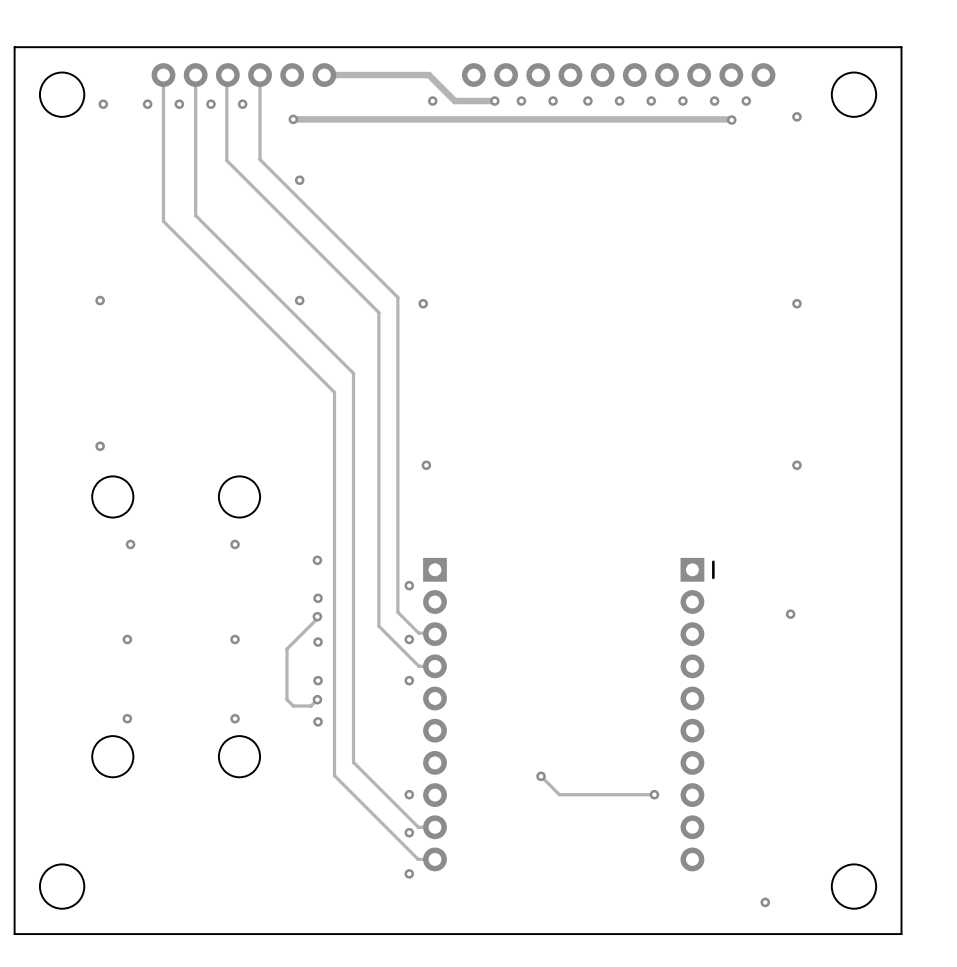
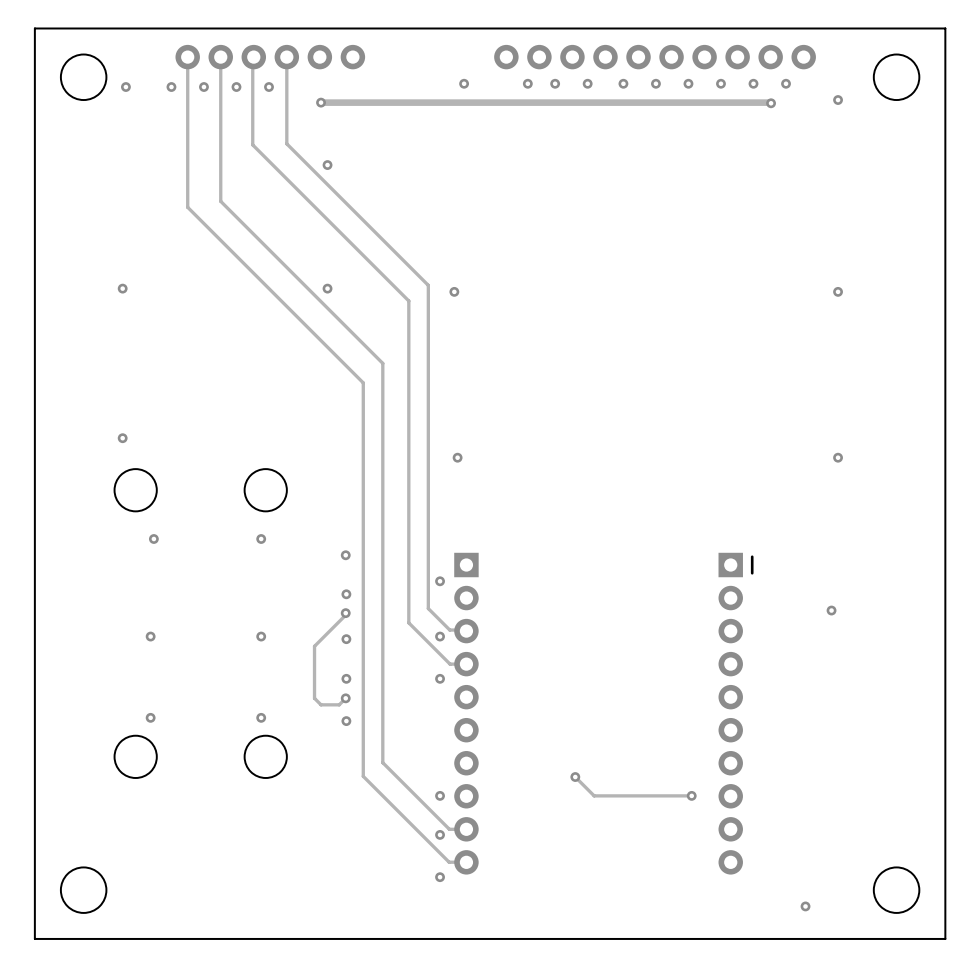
track: (324, 75) (428, 75) (454, 101) (494, 101) -> none

